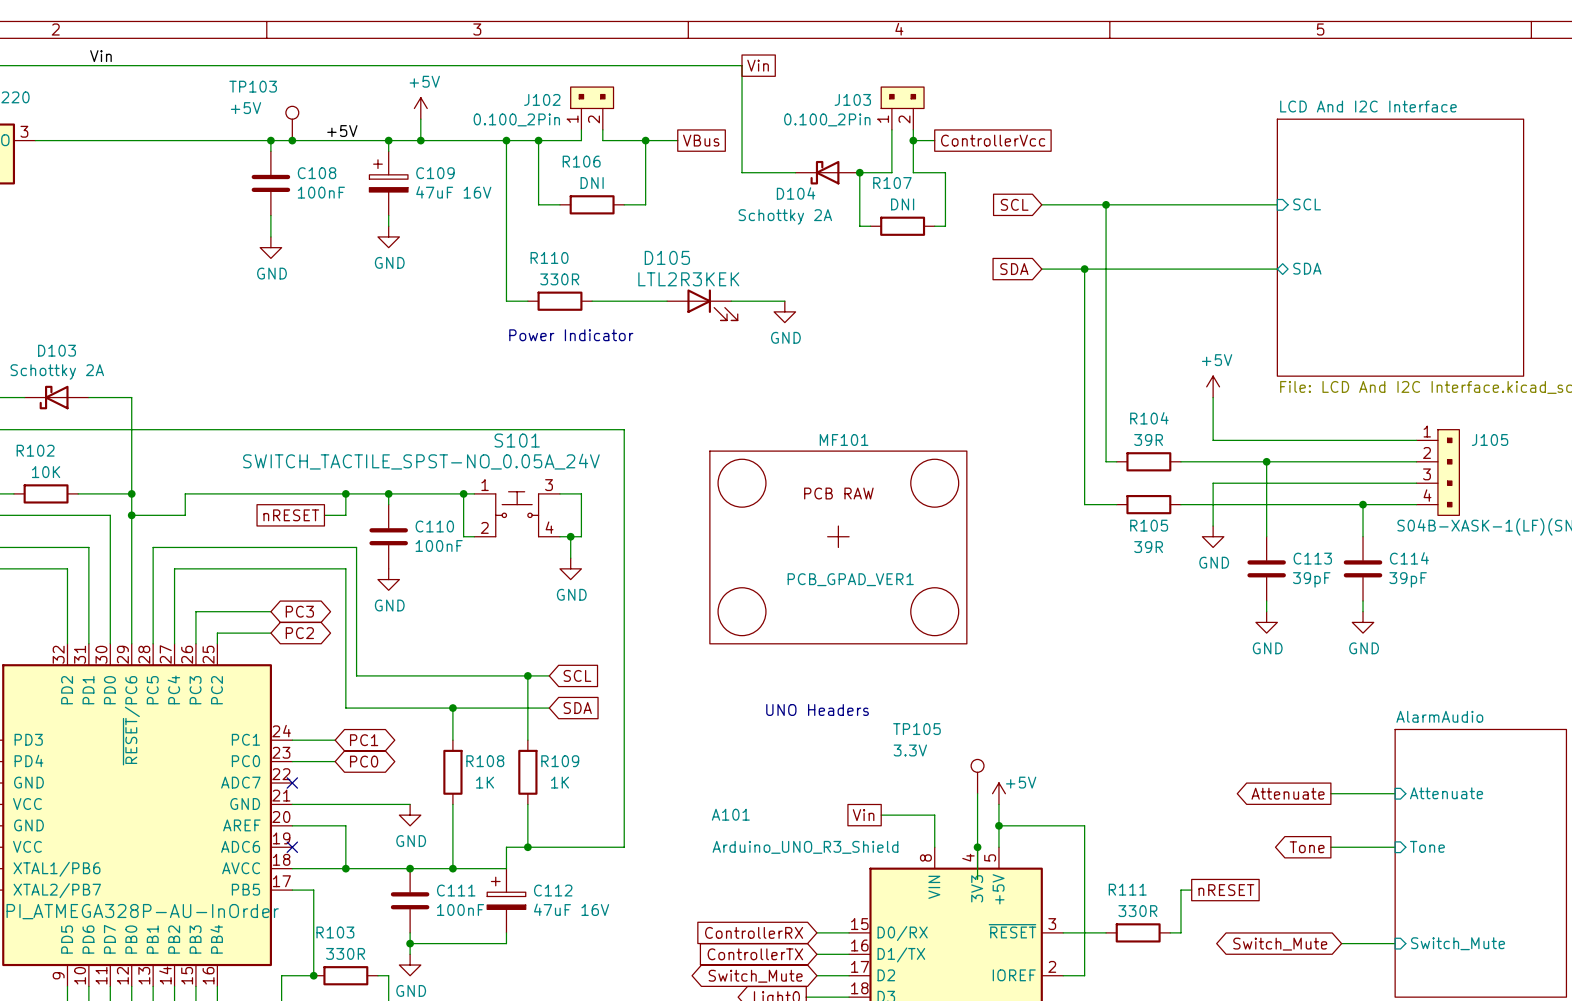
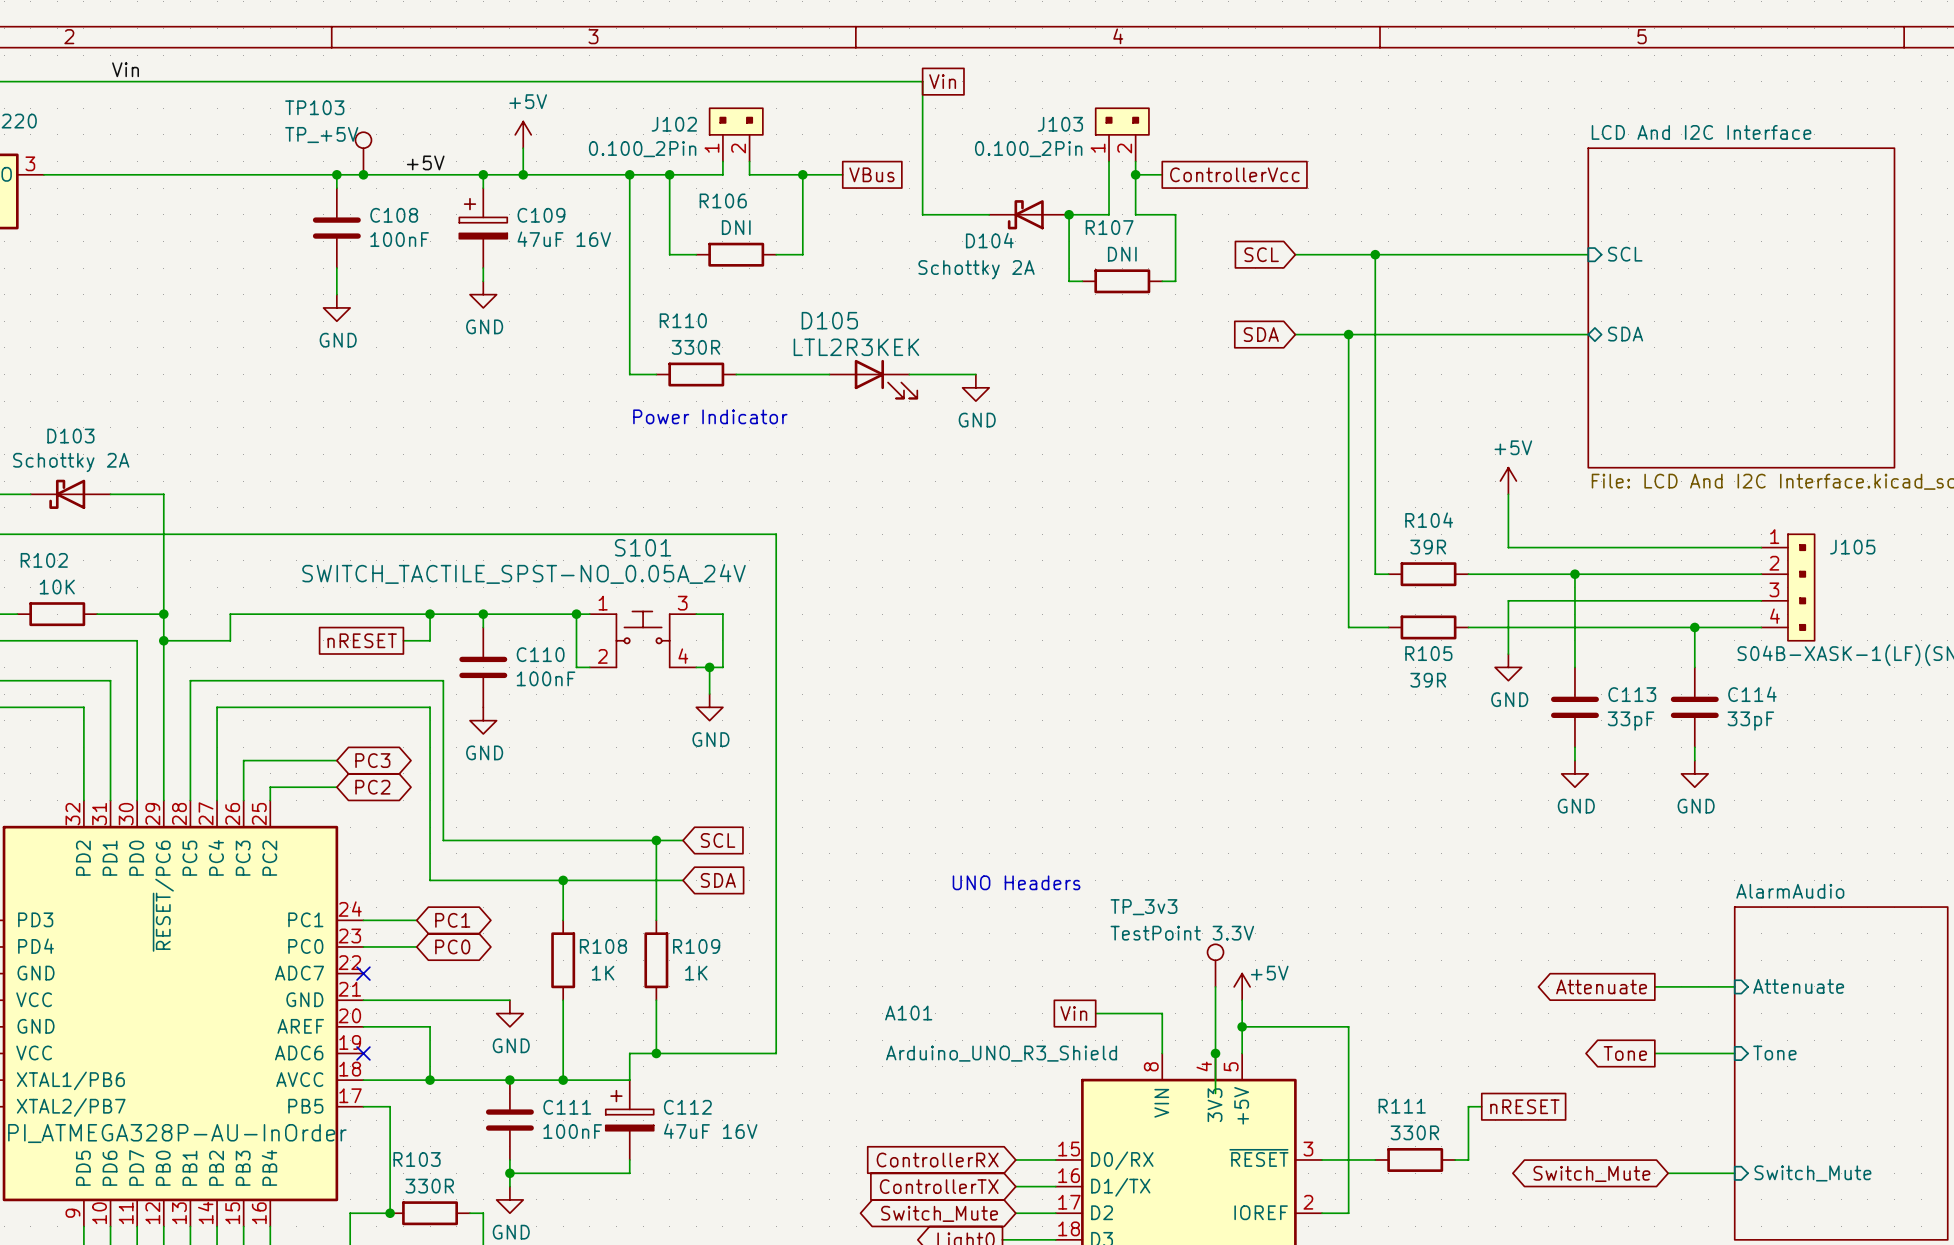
TP103 value: +5V (246, 108) -> TP_+5V (321, 135)
MF101: PCB_GPAD_VER1 (838, 547) -> none
C113 value: 39pF (1311, 579) -> 33pF (1631, 721)
C114 value: 39pF (1408, 579) -> 33pF (1750, 721)
TP105 name: TP105 (916, 729) -> TP_3v3 (1143, 907)
TP105 value: 3.3V (910, 750) -> TestPoint 3.3V (1182, 933)

